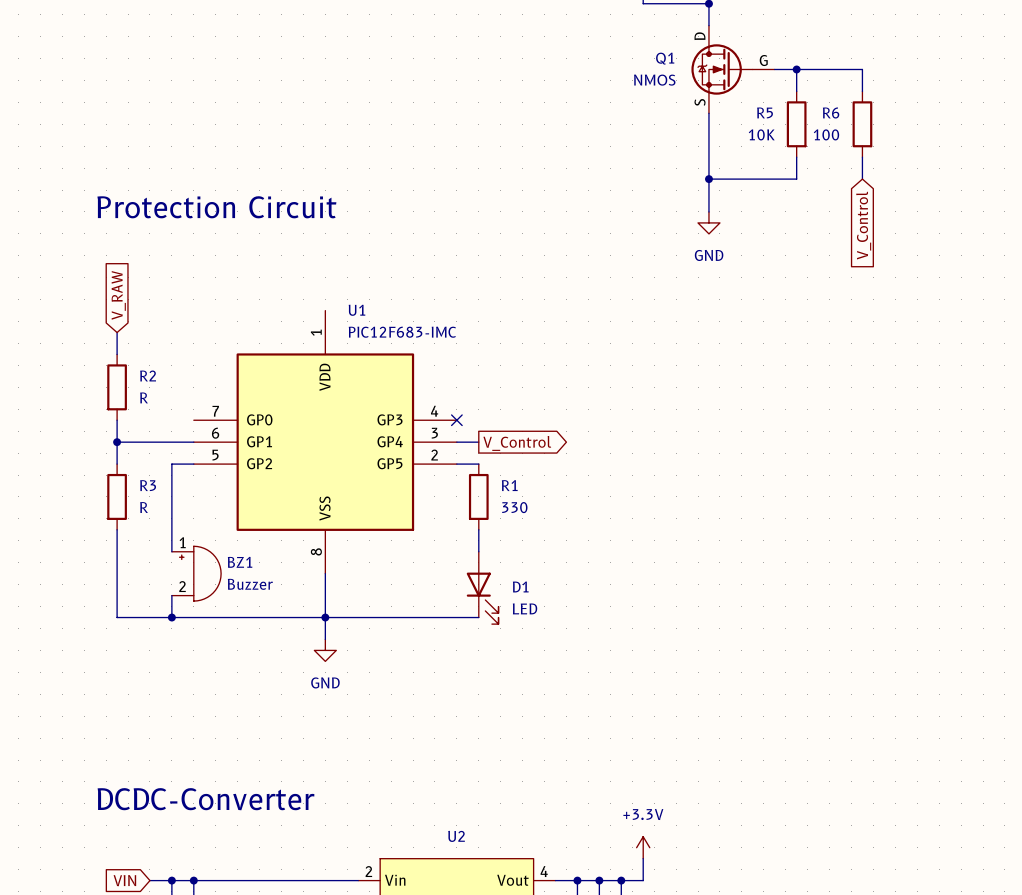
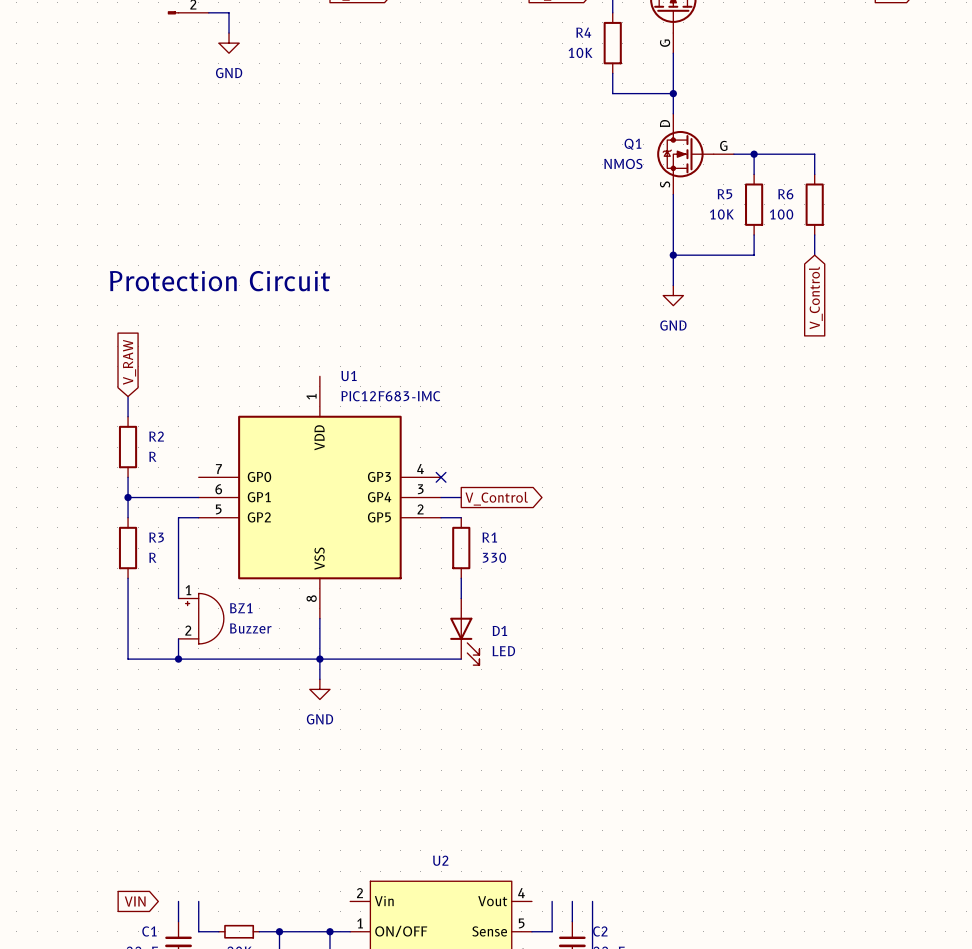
text: DCDC-Converter (206, 799) -> none
power symbol: +3.3V (643, 847) -> none
wire: (643, 858) (643, 880) (555, 880) -> none
wire: (149, 880) (358, 880) -> none
junction: (171, 880) -> none
junction: (193, 880) -> none
junction: (577, 880) -> none
junction: (599, 880) -> none
junction: (621, 880) -> none

